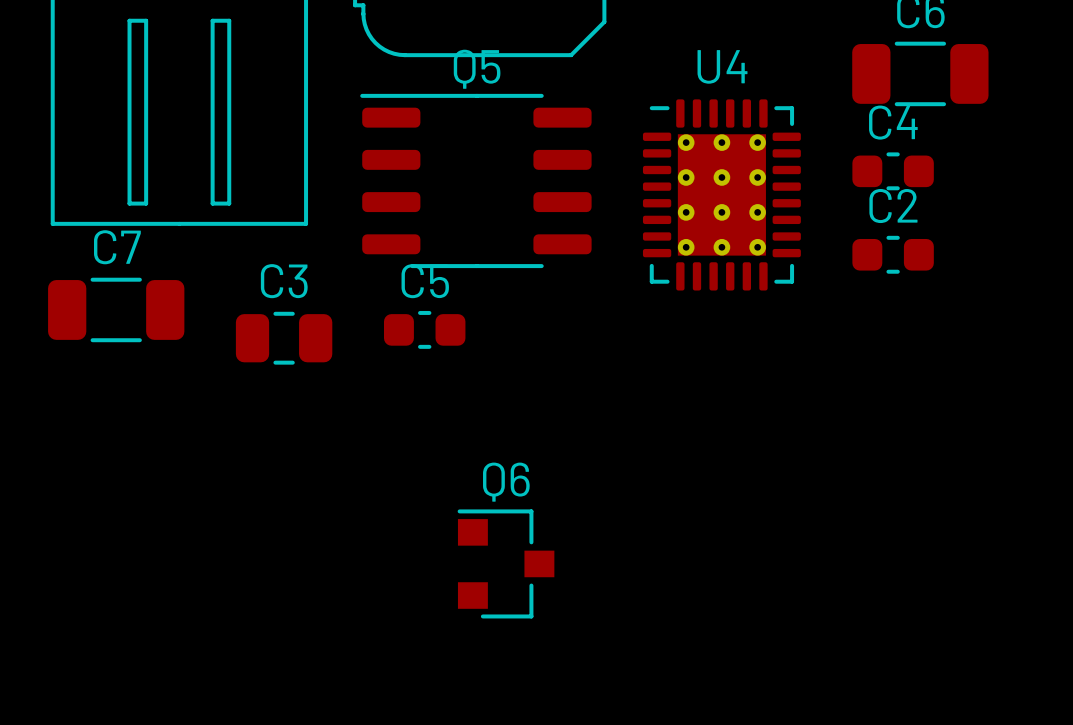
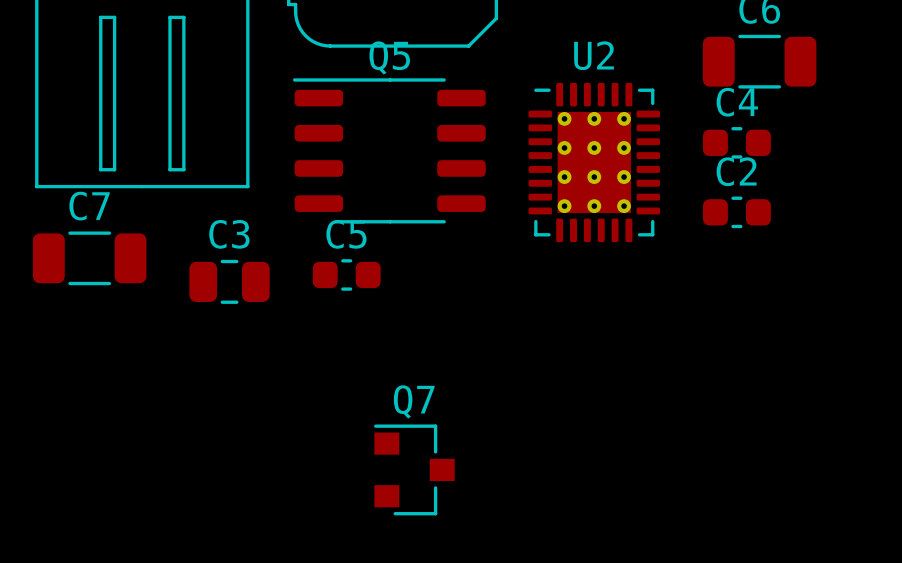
U4 name: U4 (722, 66) -> U2 (594, 55)
Q6 name: Q6 (506, 482) -> Q7 (414, 401)

